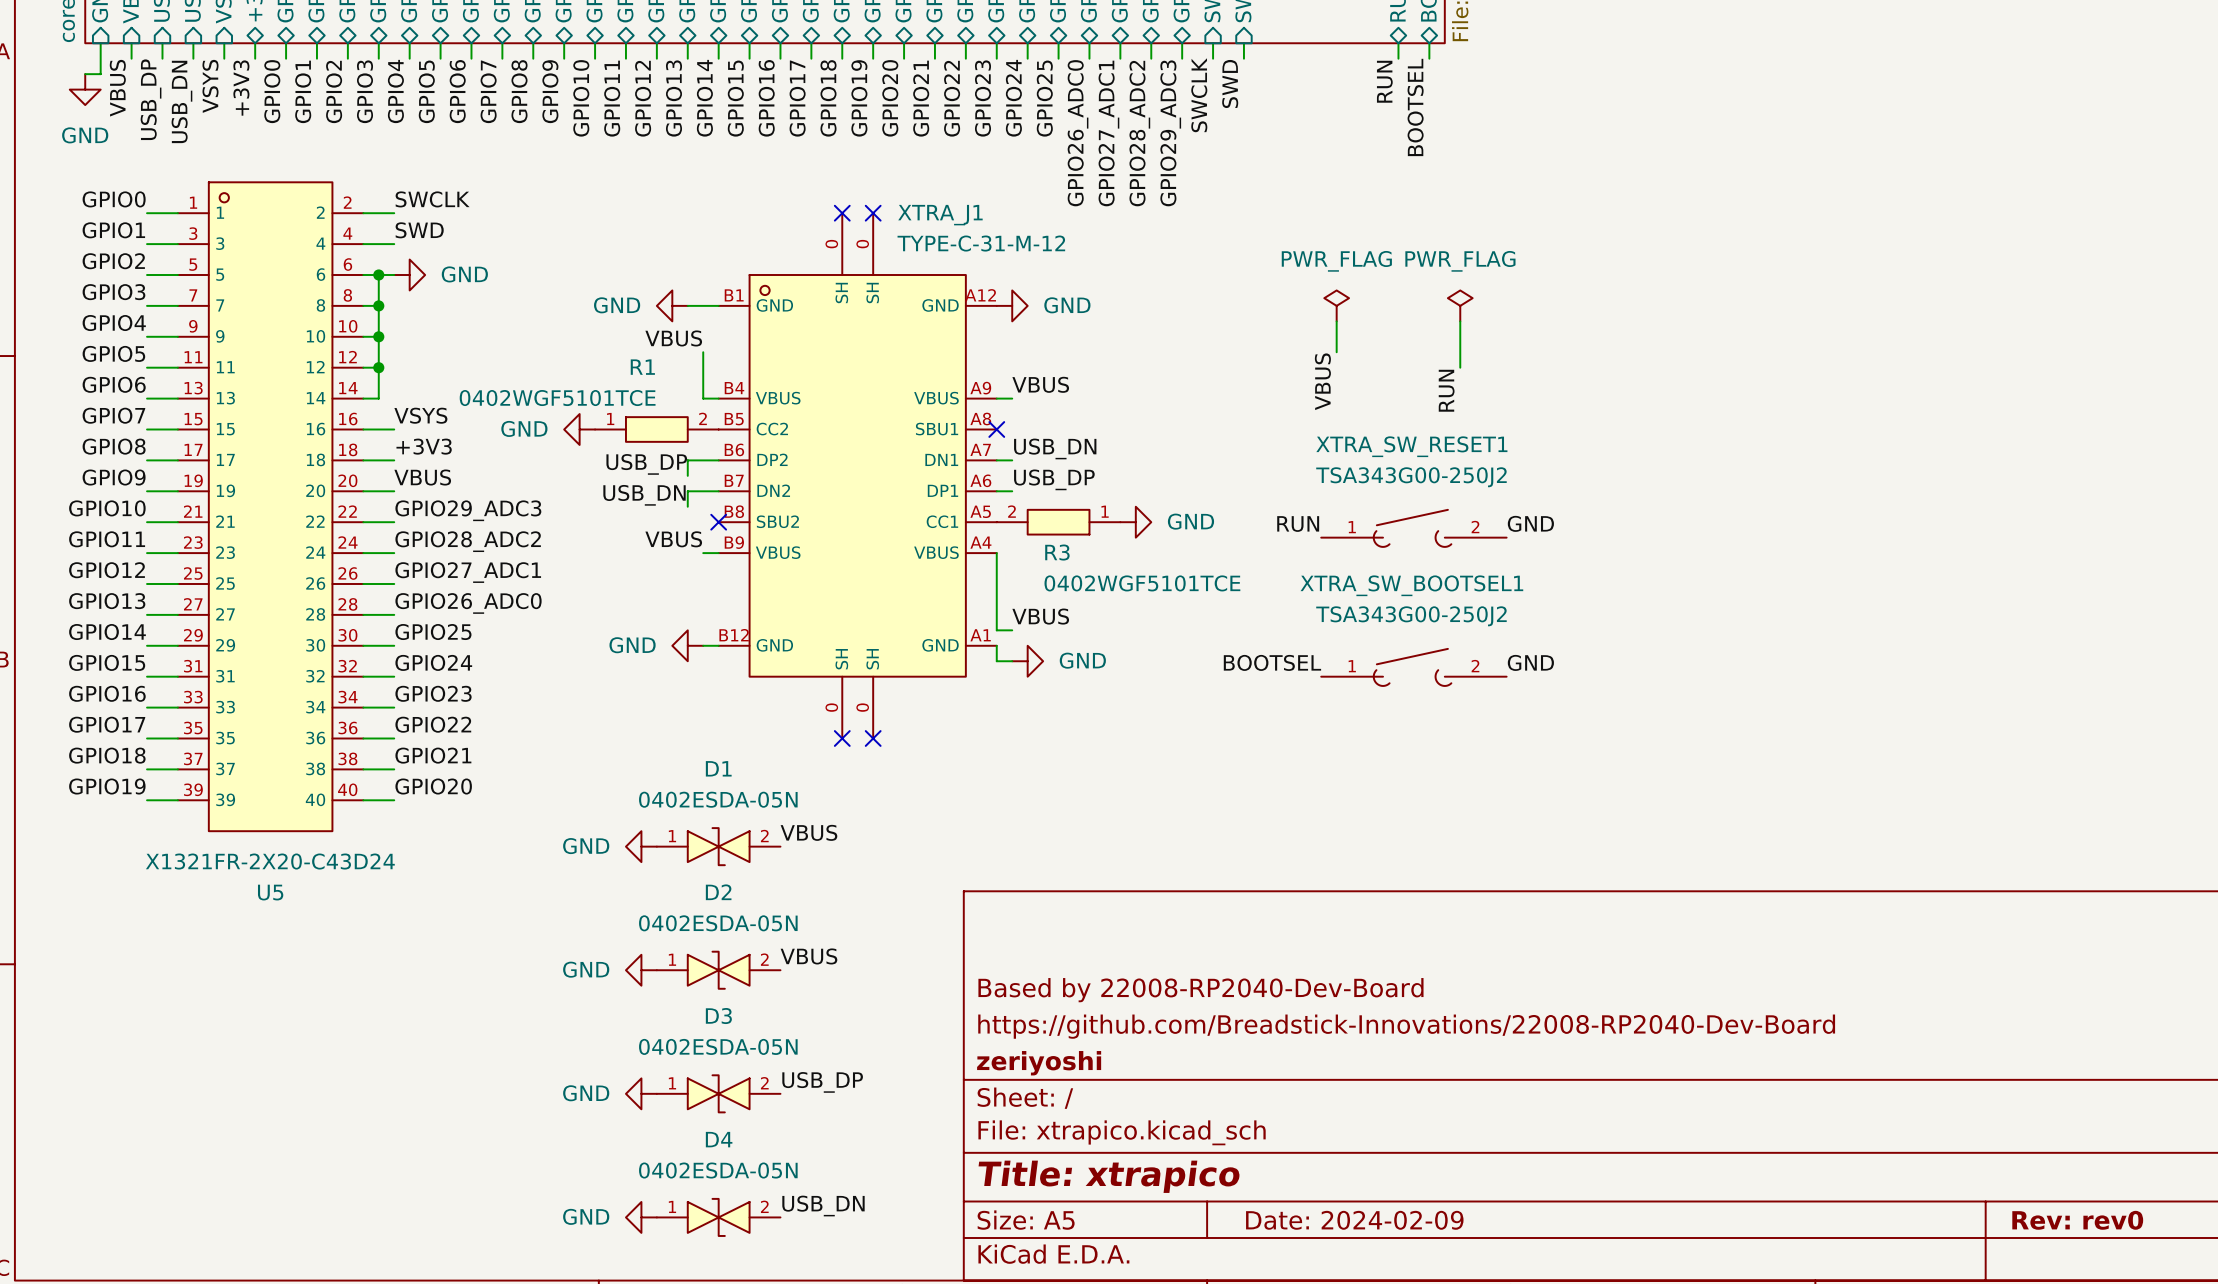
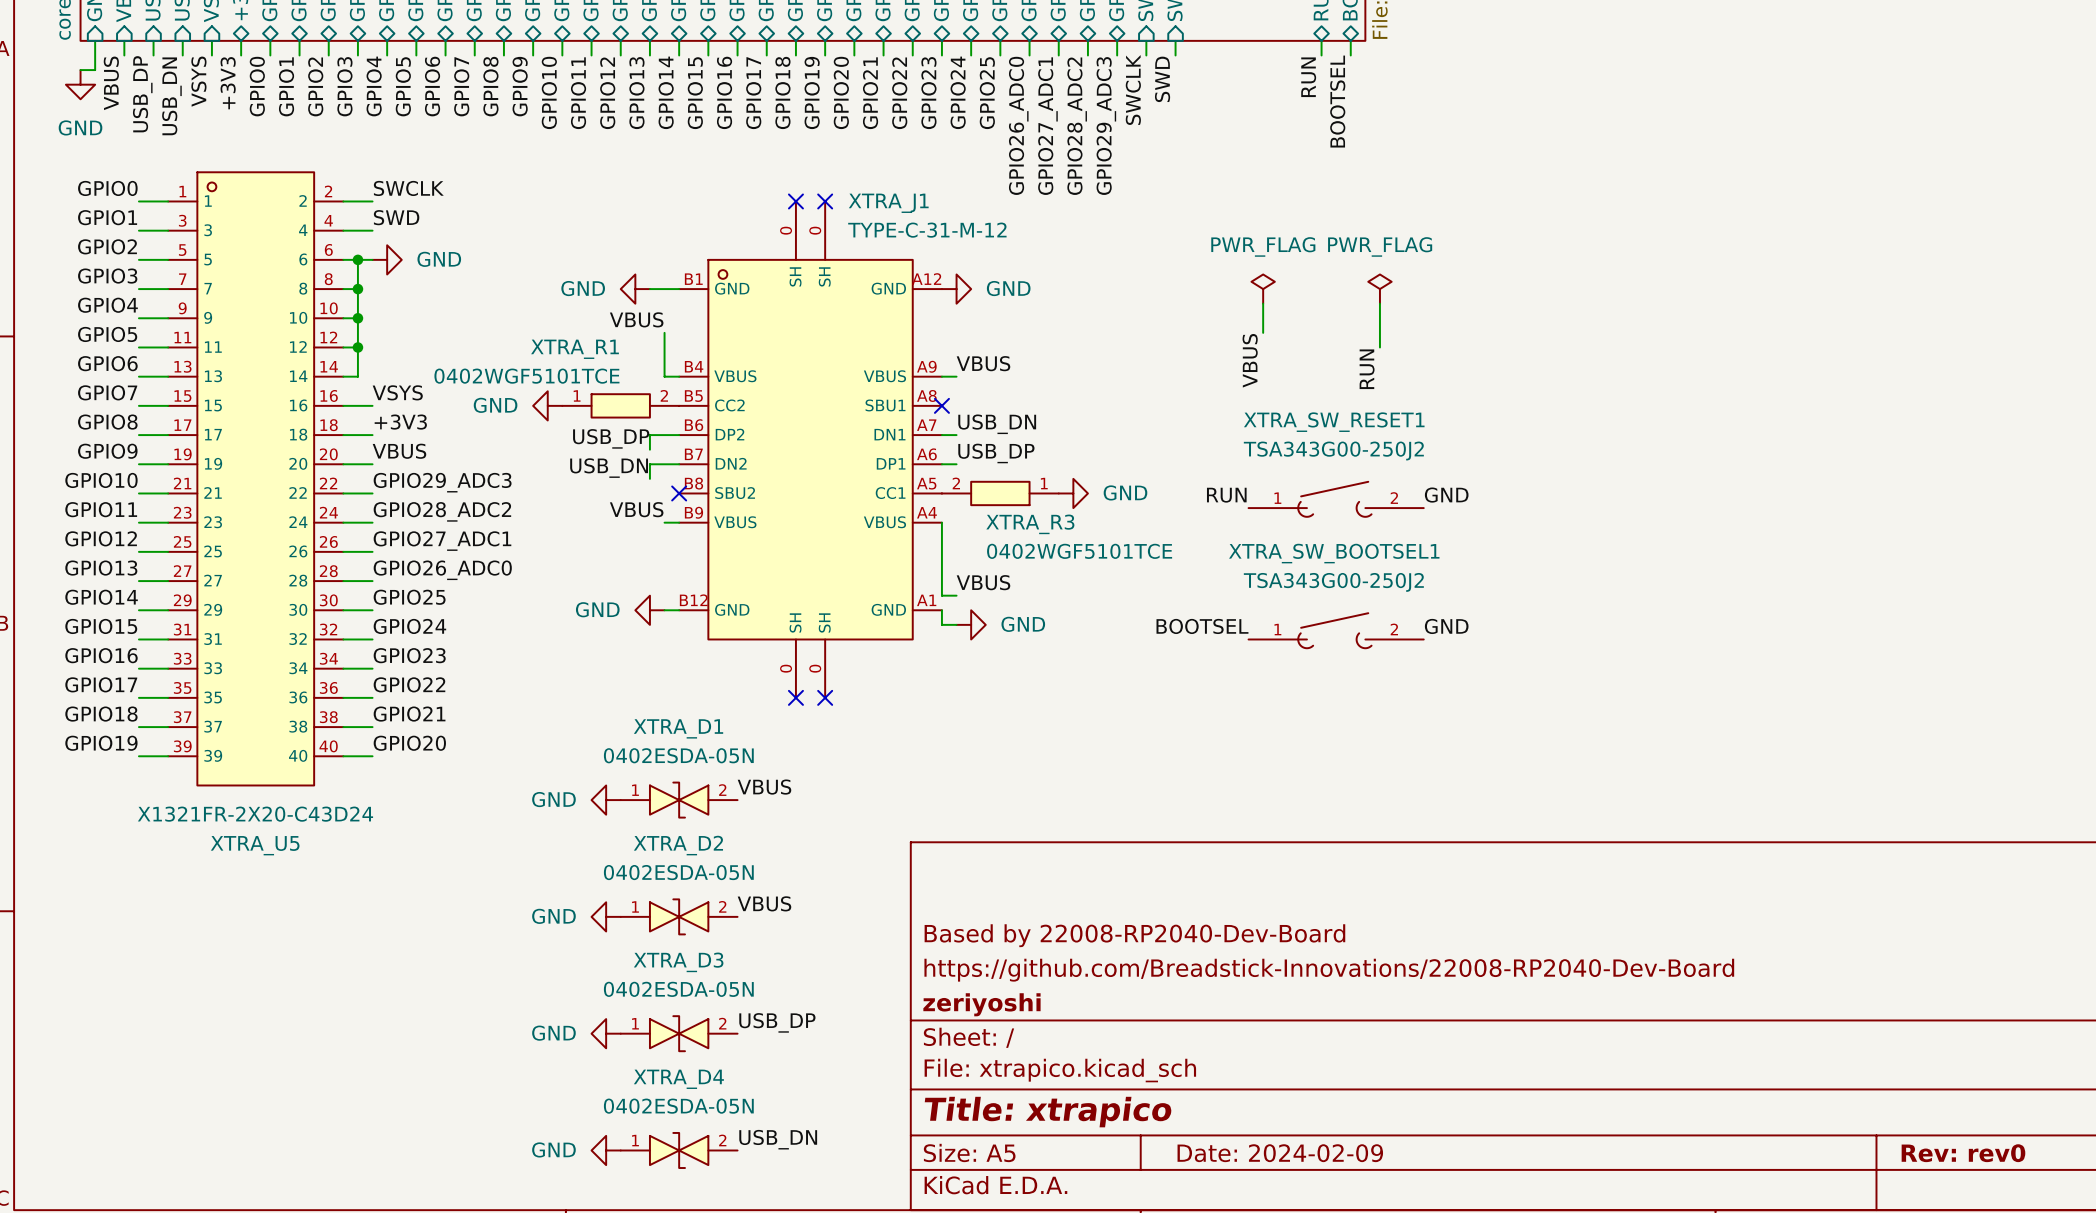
R1 name: R1 (642, 367) -> XTRA_R1 (575, 349)
R3 name: R3 (1057, 552) -> XTRA_R3 (1030, 524)
D1 name: D1 (718, 768) -> XTRA_D1 (678, 728)
U5 name: U5 (270, 892) -> XTRA_U5 (255, 845)
D2 name: D2 (718, 892) -> XTRA_D2 (678, 845)
D3 name: D3 (718, 1016) -> XTRA_D3 (678, 962)
D4 name: D4 (719, 1139) -> XTRA_D4 (678, 1079)

